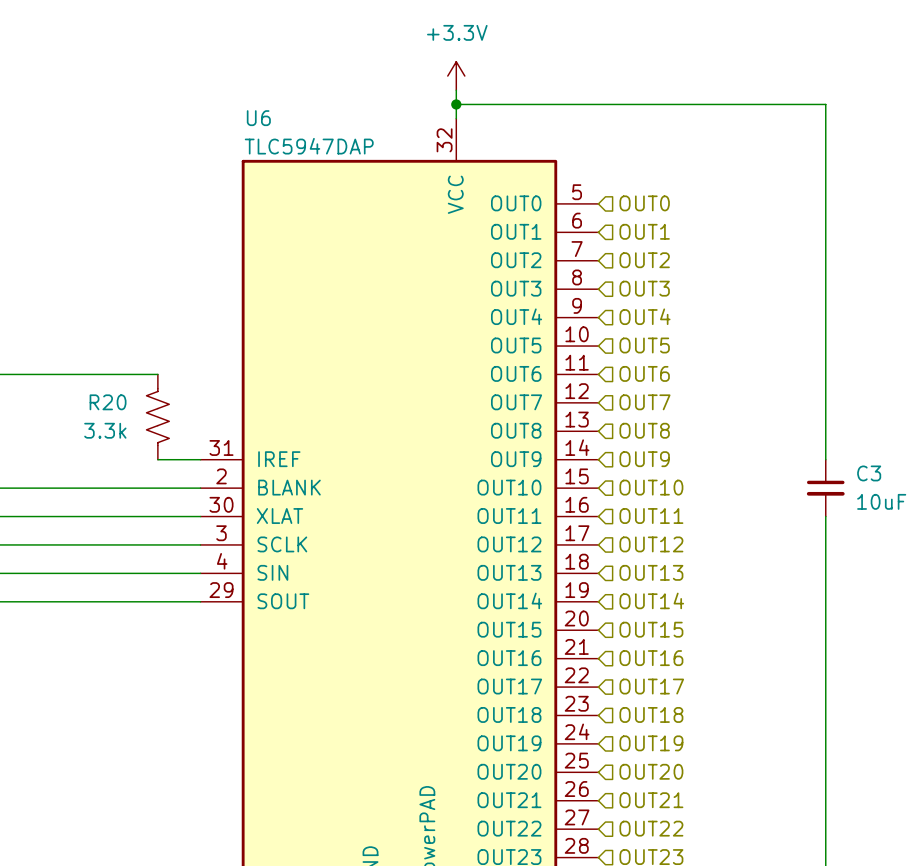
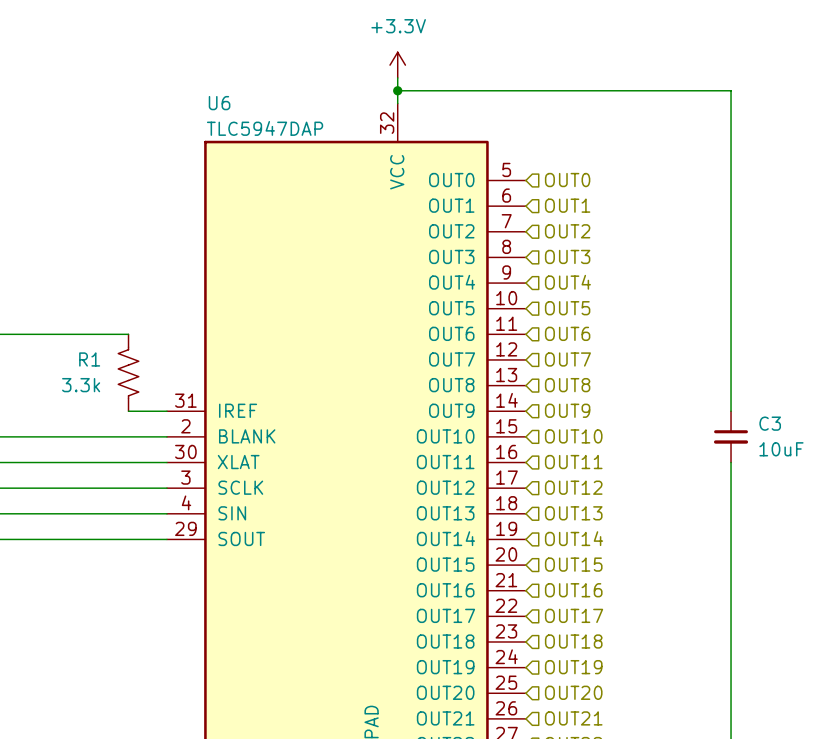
R20 name: R20 (108, 402) -> R1 (89, 359)

